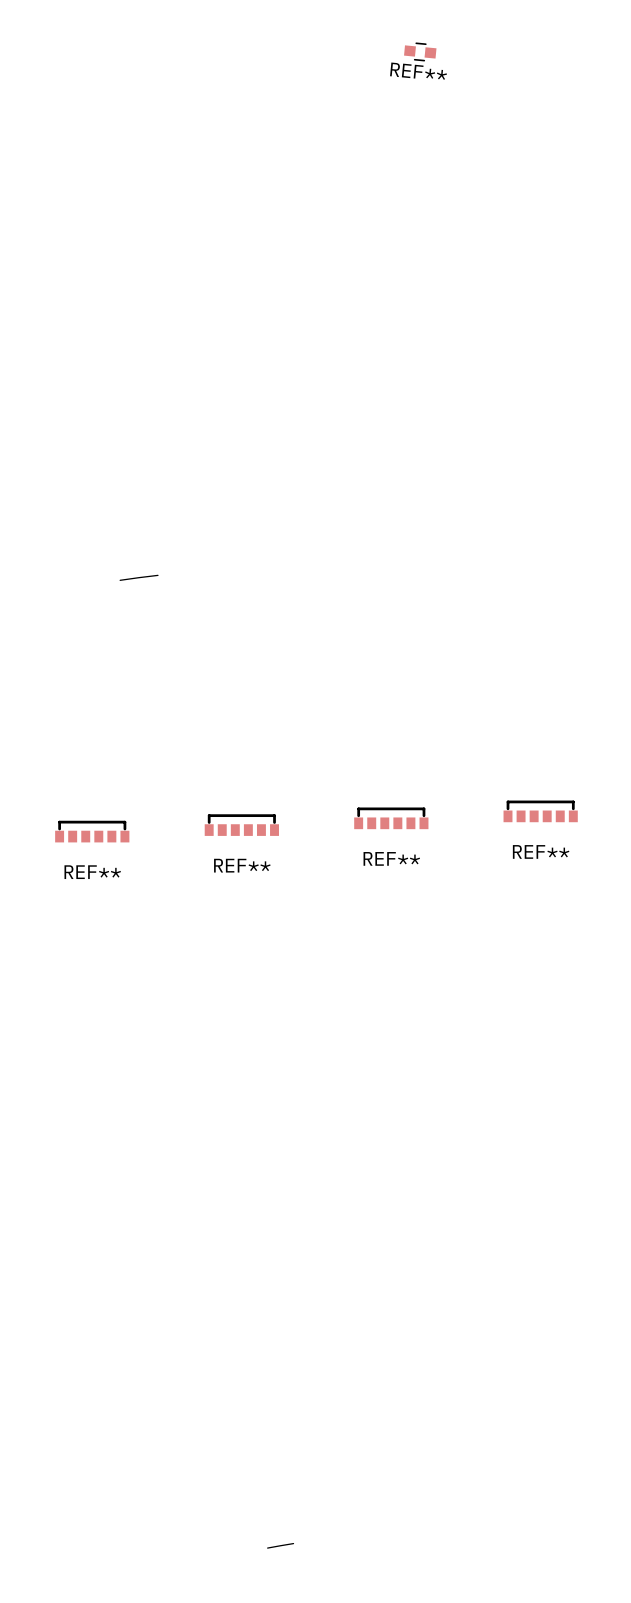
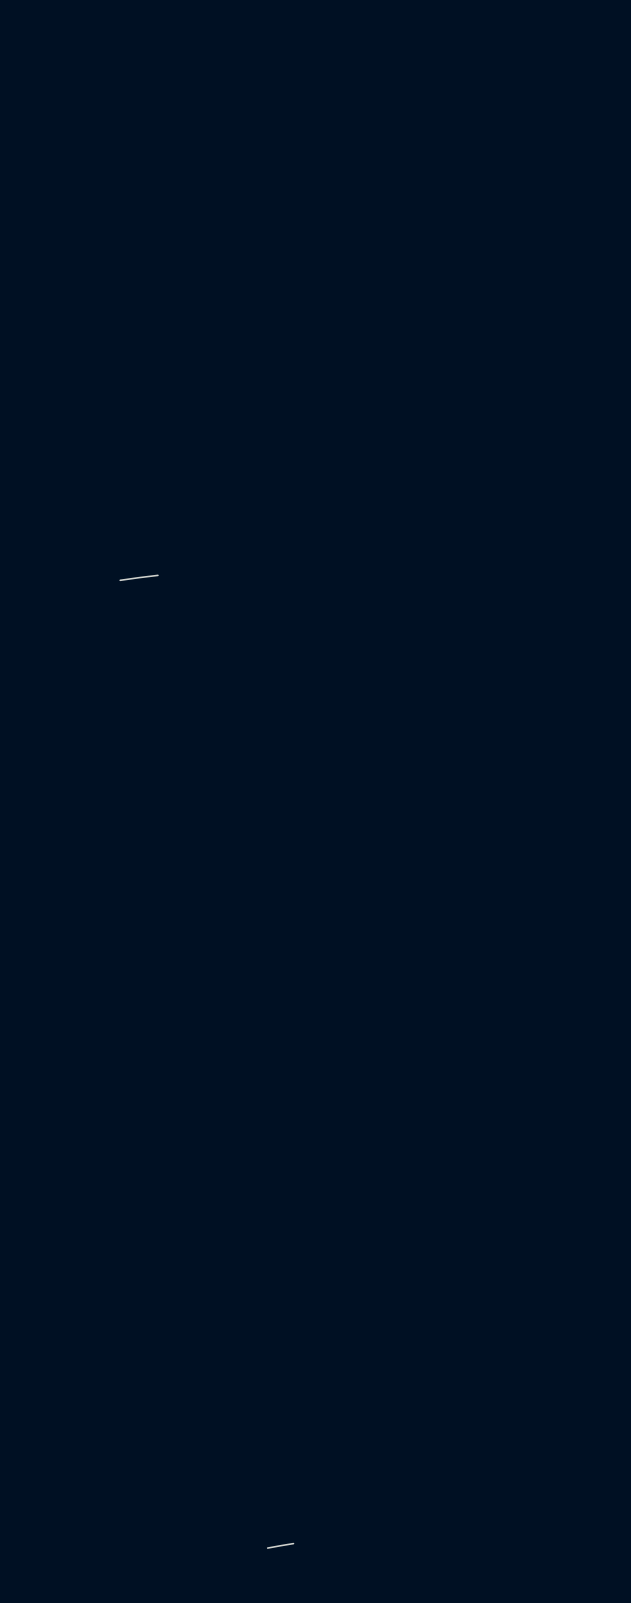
REF**: (420, 51) -> none
REF**: (540, 811) -> none
REF**: (391, 818) -> none
REF**: (241, 825) -> none
REF**: (92, 831) -> none

